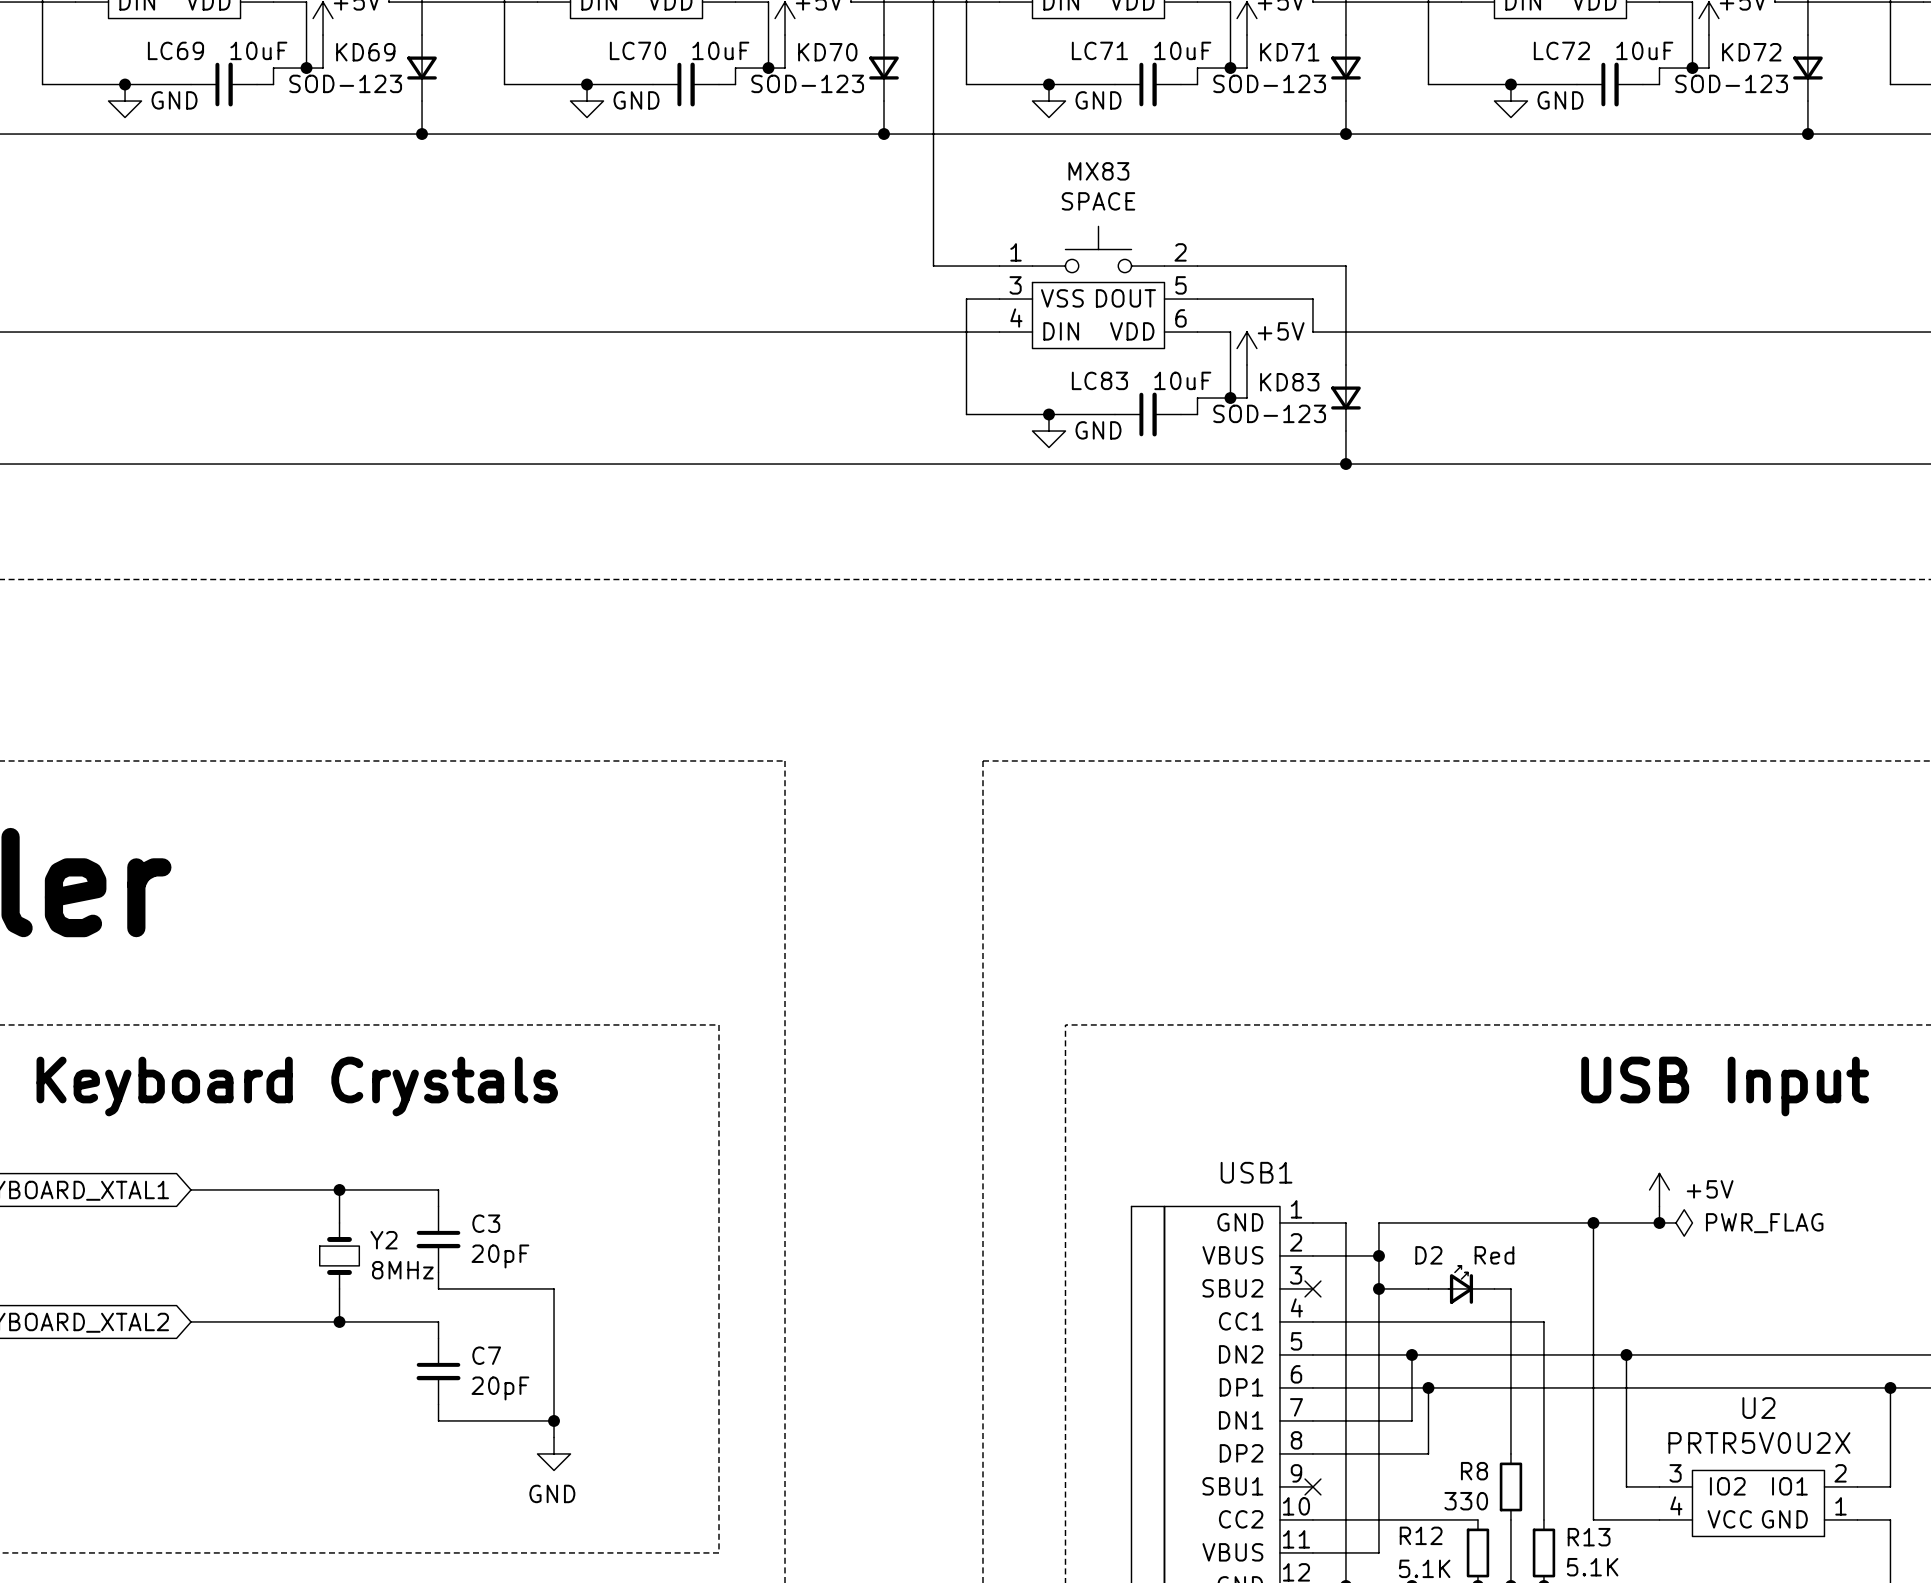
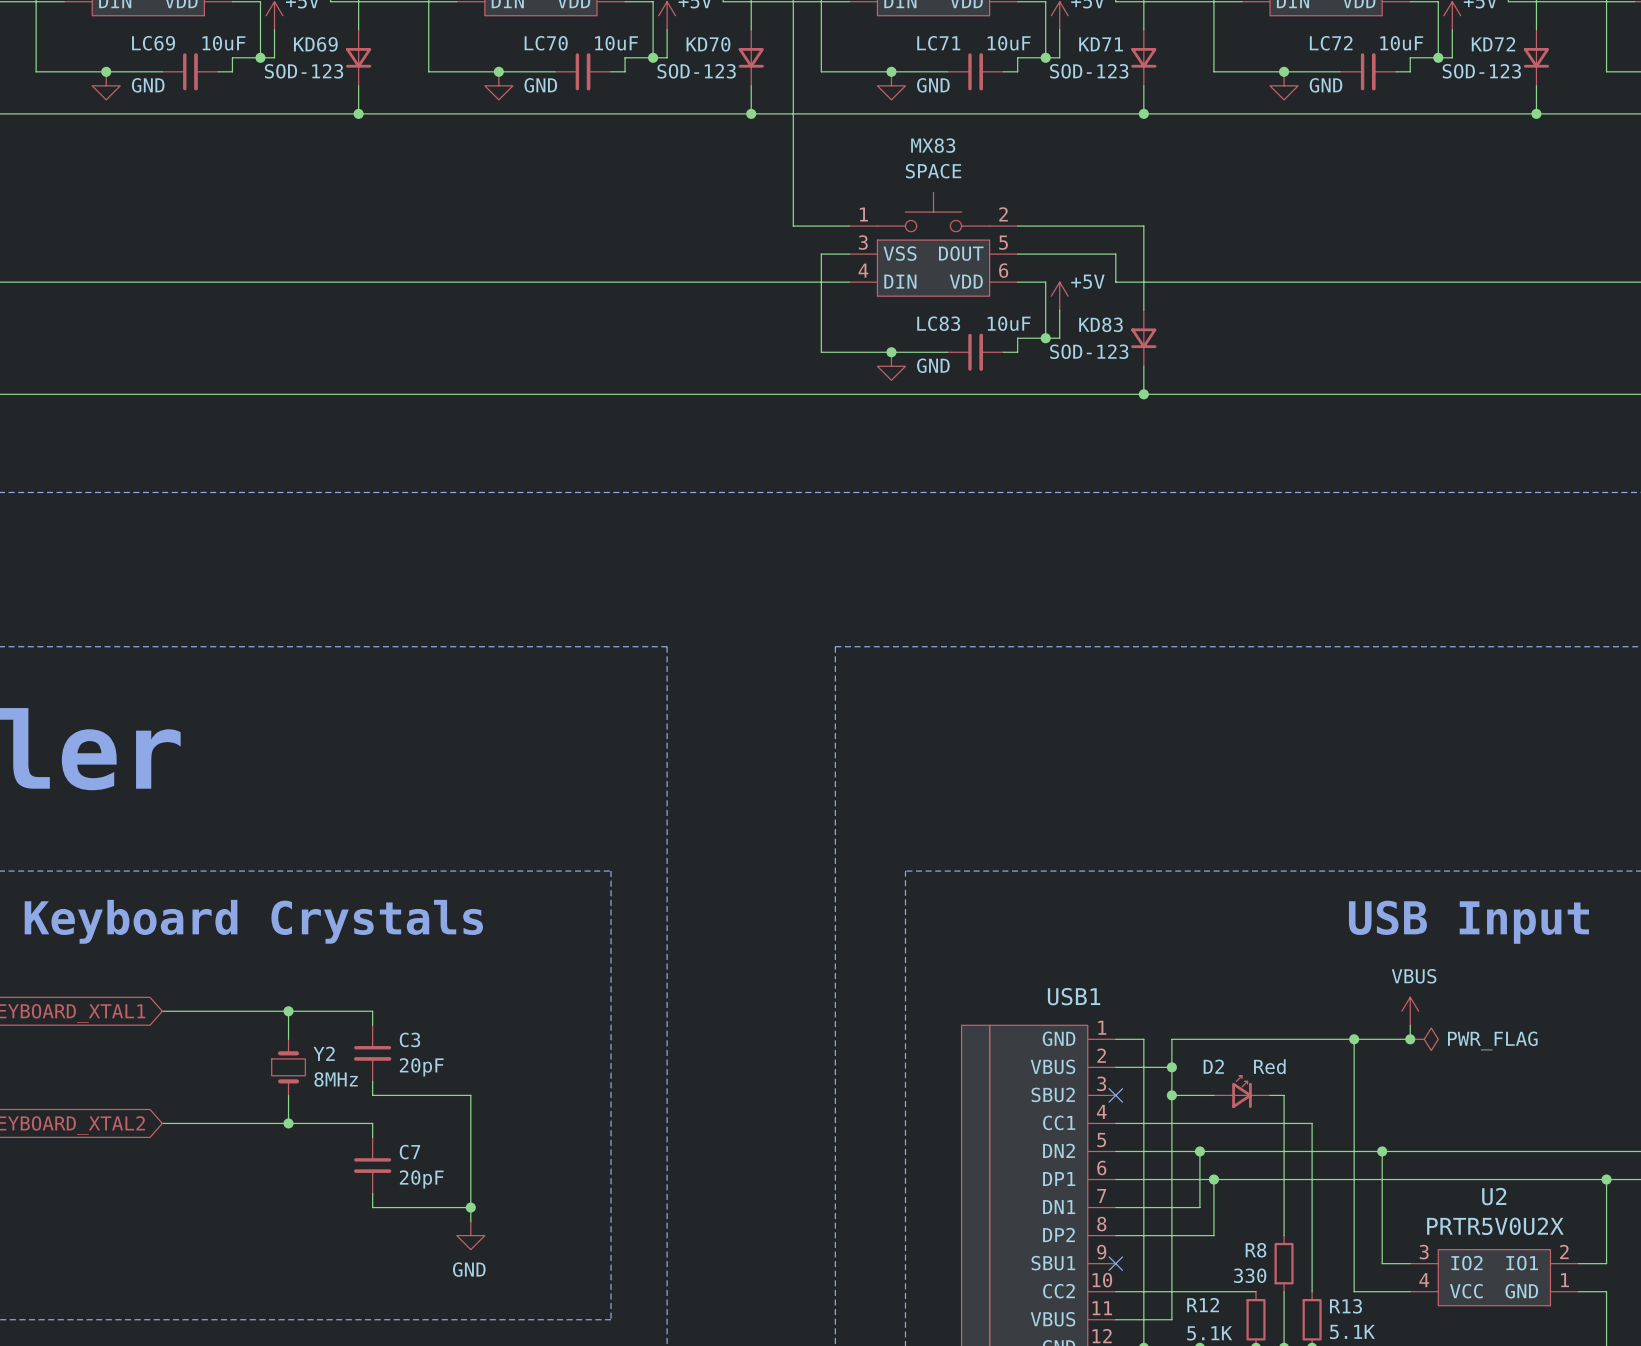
power symbol: +5V (1659, 1189) -> VBUS (1410, 1011)

